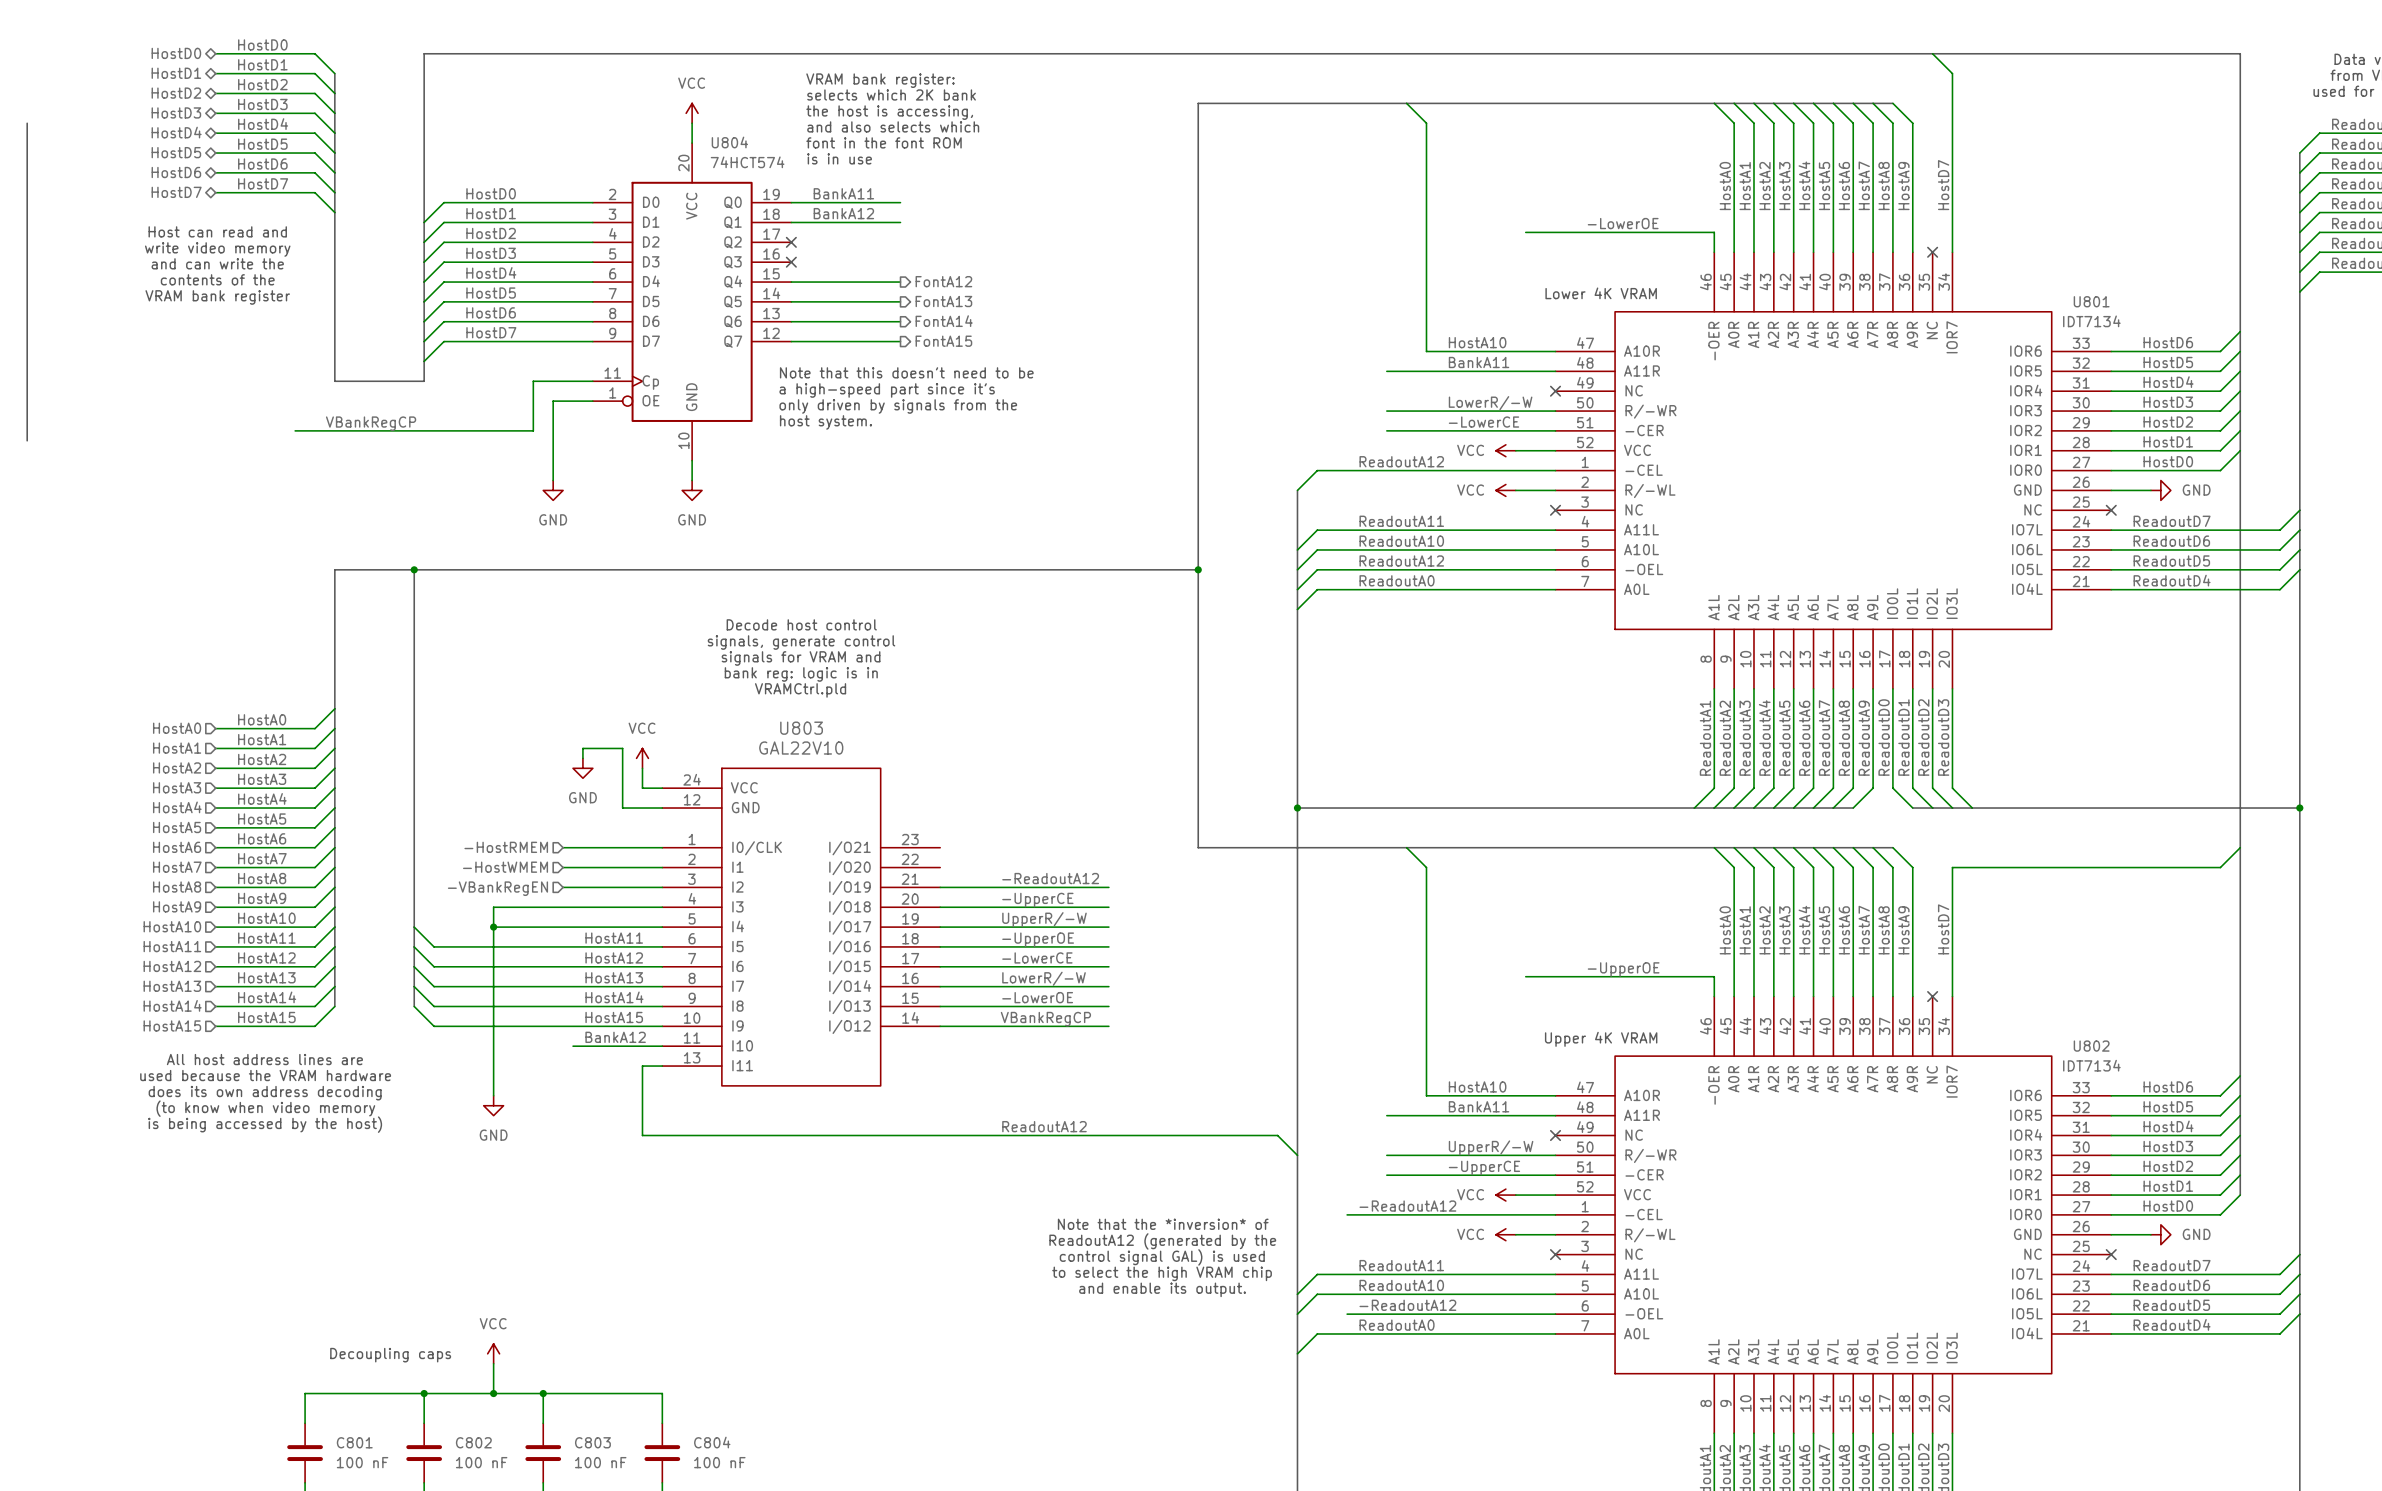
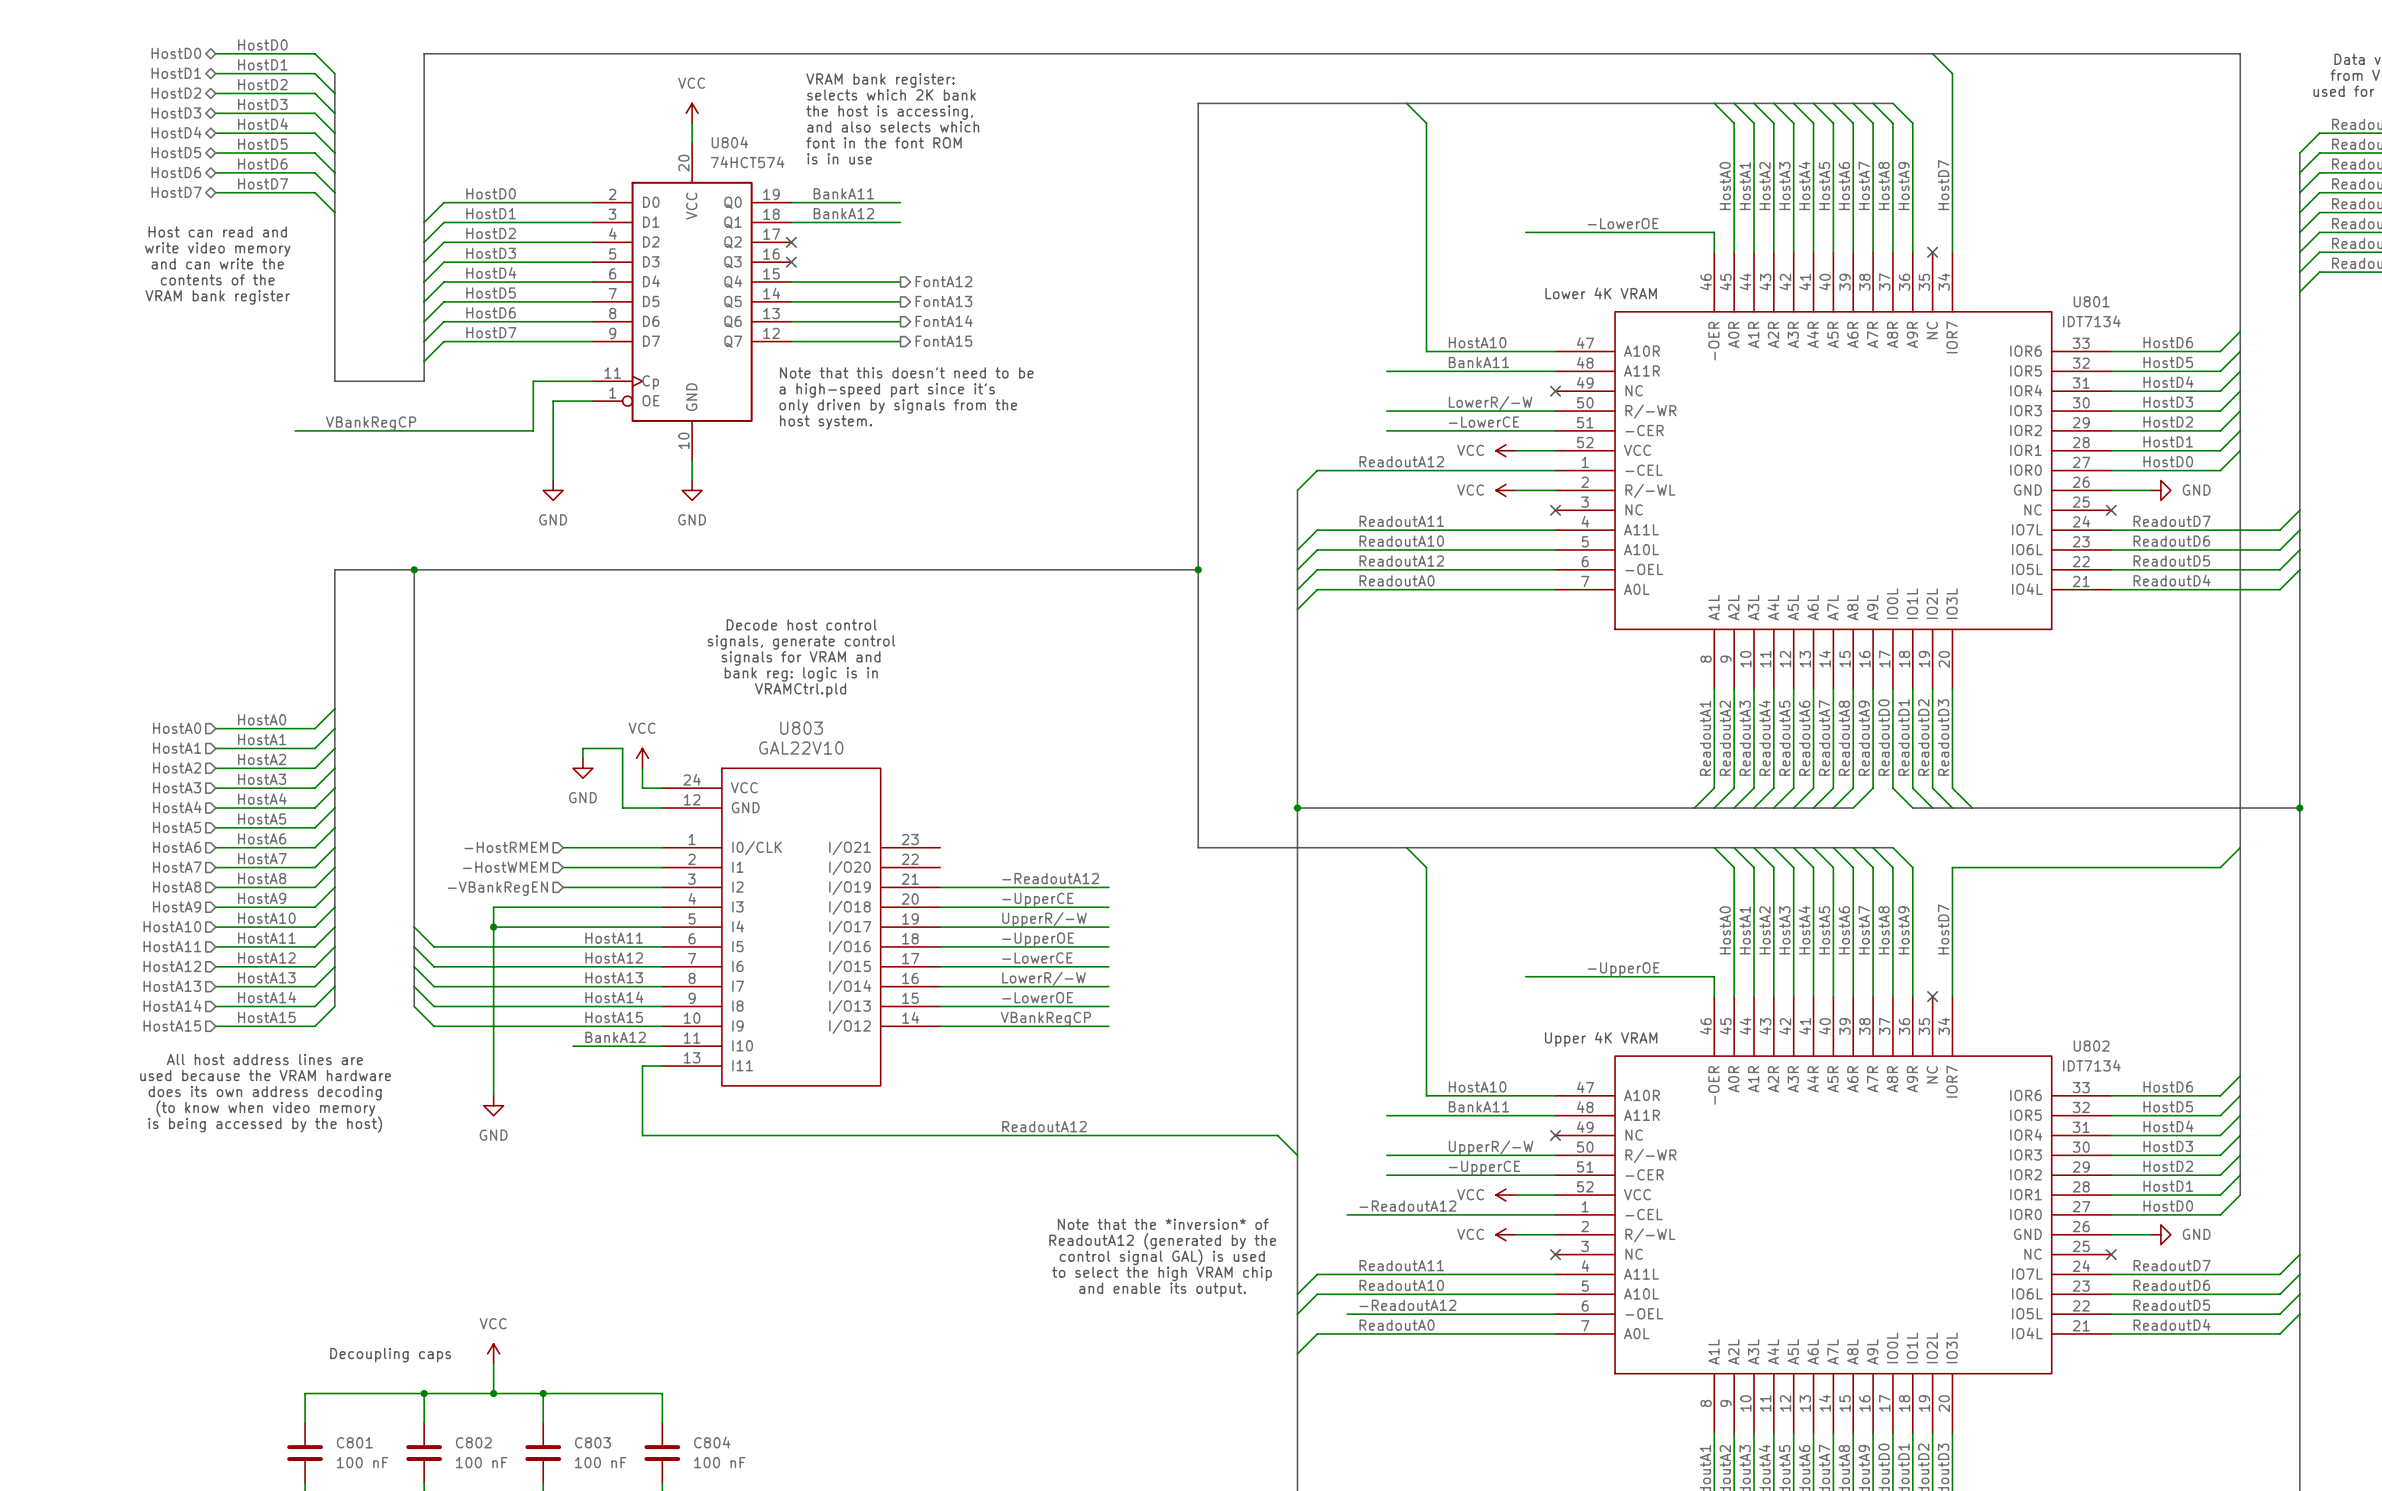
bus: (27, 123) (27, 440) -> none

